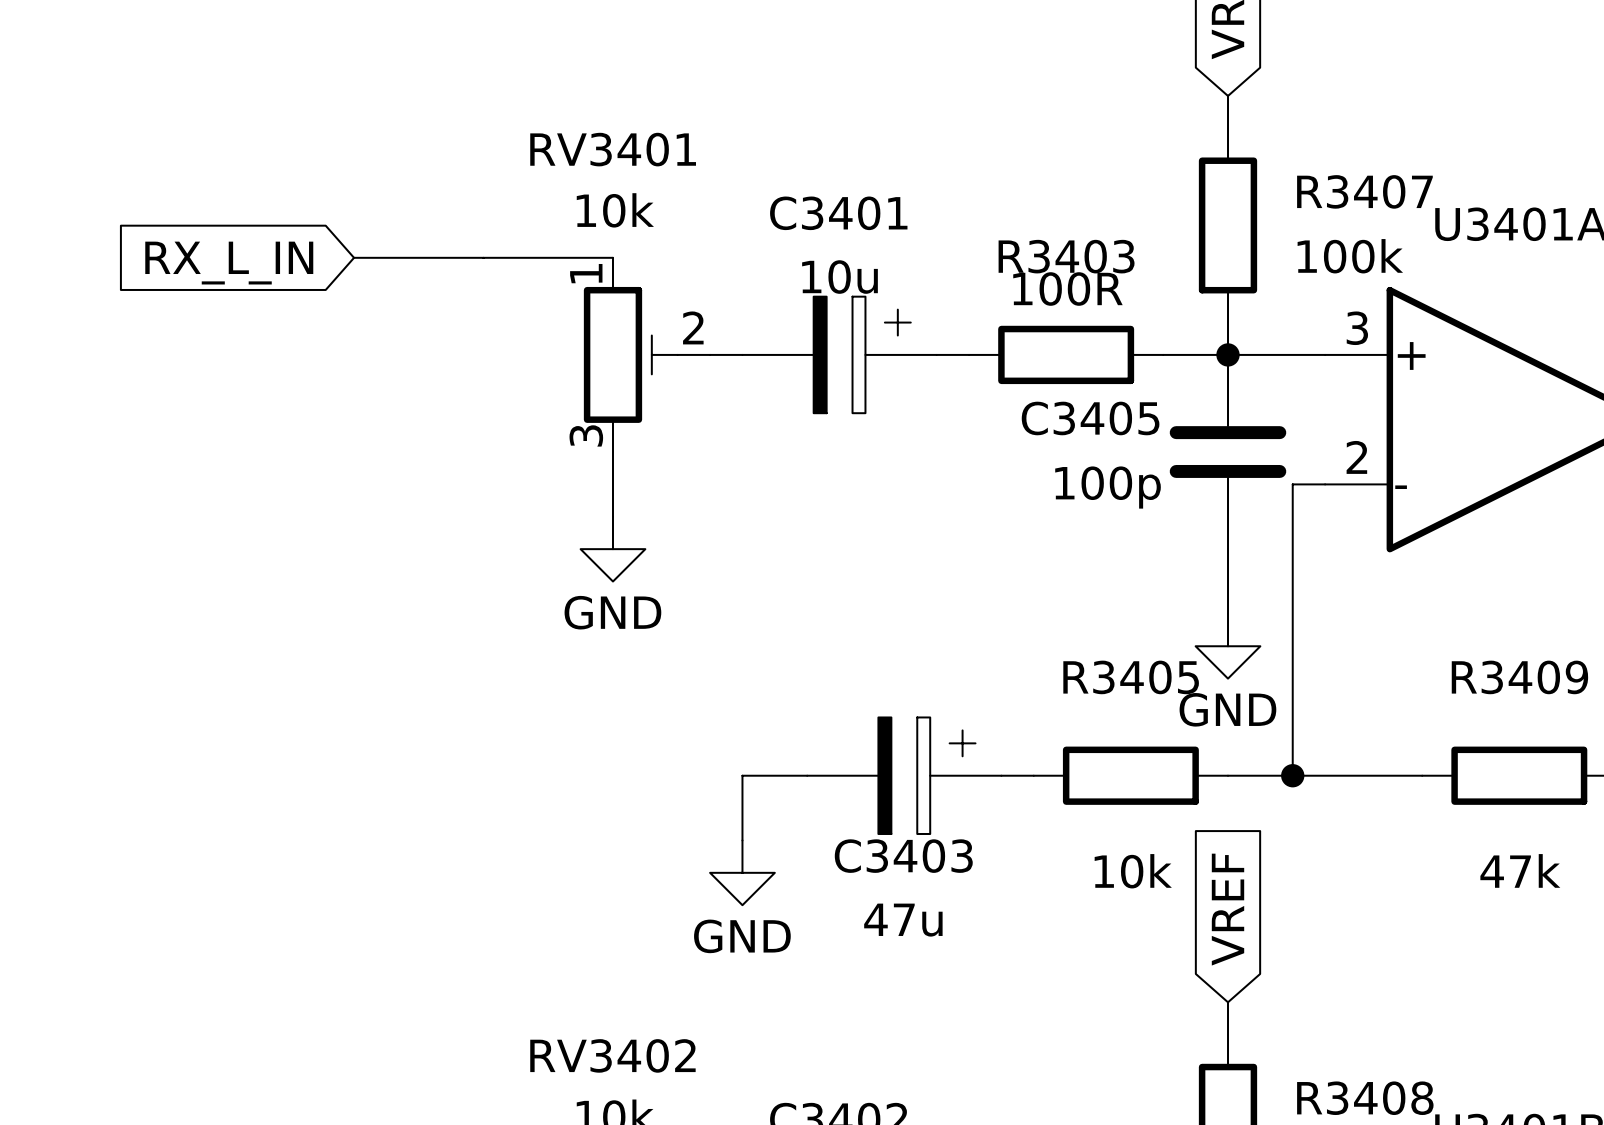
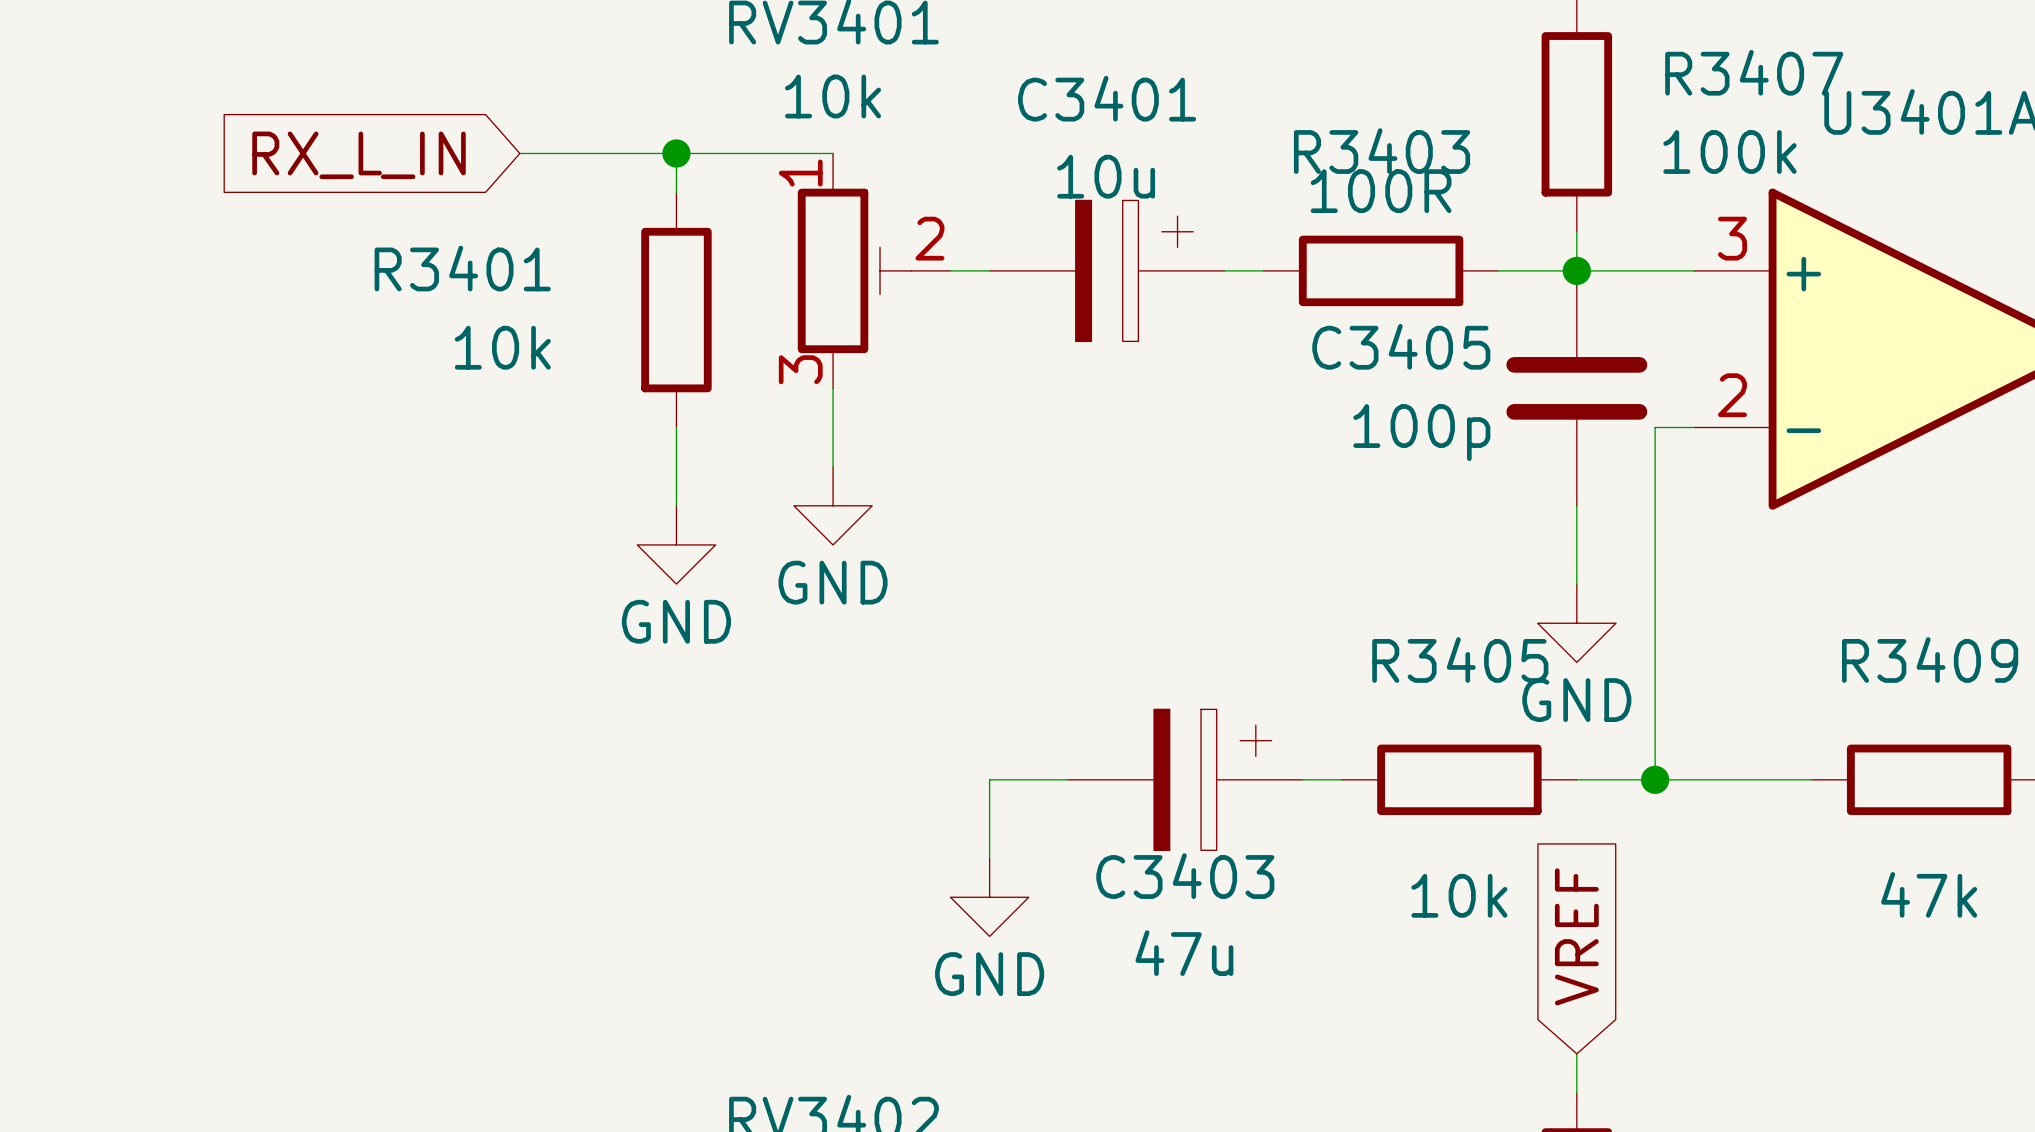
wire: none -> (676, 153) (676, 192)
junction: none -> (676, 153)
R3401: none -> 10k (676, 310)
wire: none -> (676, 427) (676, 505)
power symbol: none -> GND (676, 544)

